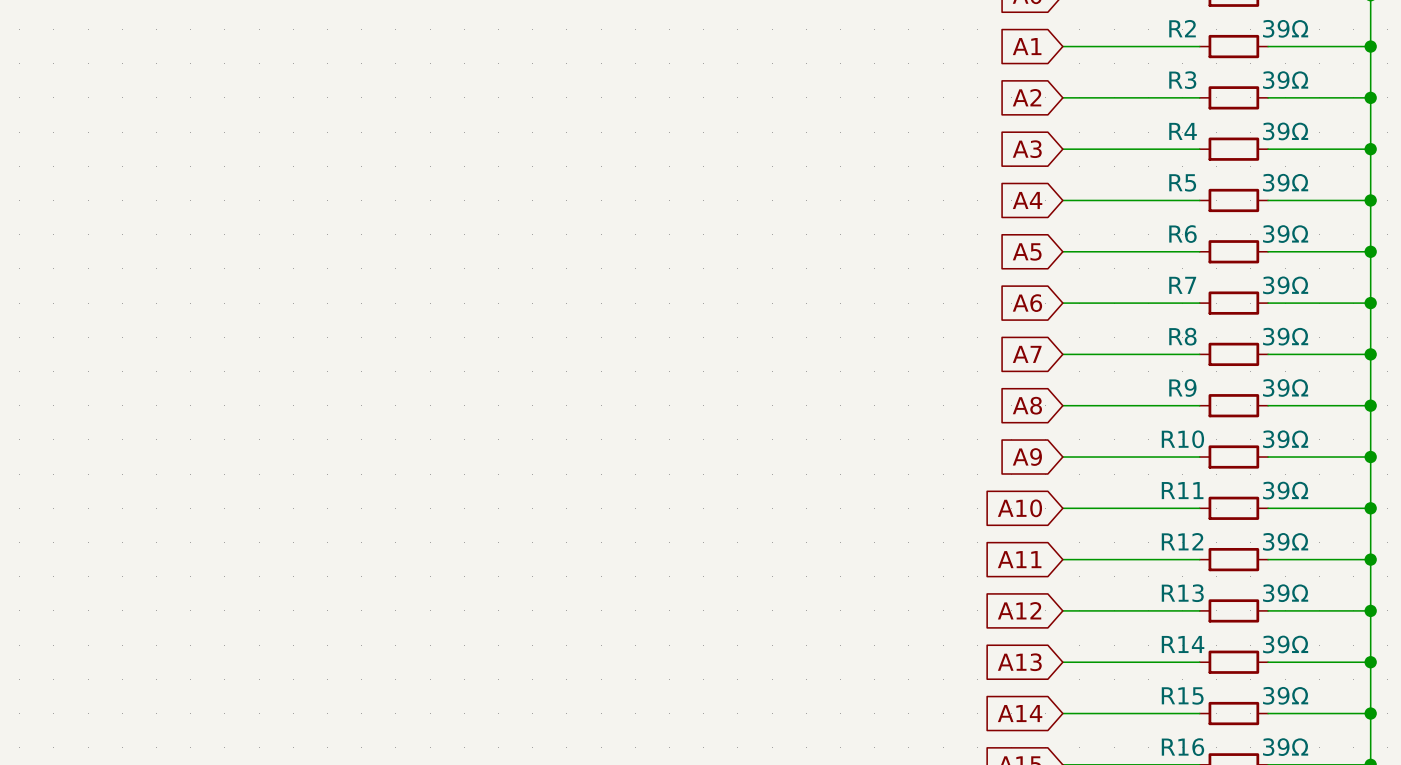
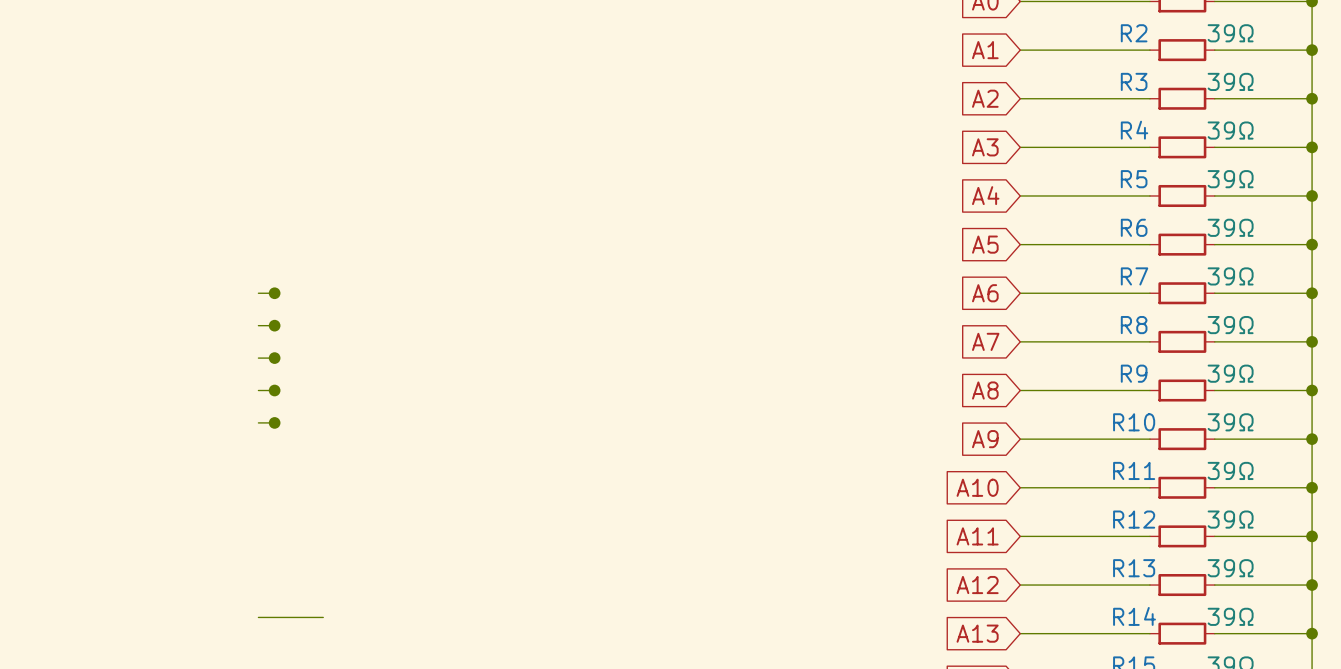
wire: none -> (258, 293) (274, 293)
junction: none -> (274, 293)
wire: none -> (258, 325) (274, 325)
junction: none -> (274, 325)
wire: none -> (258, 358) (274, 358)
junction: none -> (274, 358)
wire: none -> (258, 390) (274, 390)
junction: none -> (274, 390)
wire: none -> (258, 422) (274, 422)
junction: none -> (274, 422)
wire: none -> (258, 617) (323, 617)

